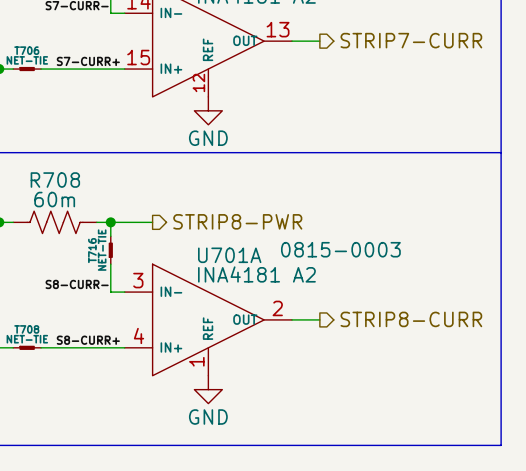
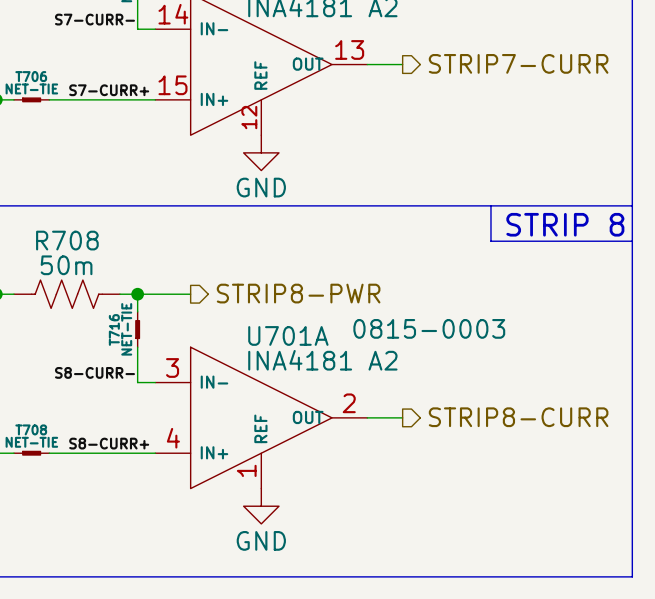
line: none -> (490, 205) (490, 241) (632, 241)
text: none -> STRIP 8 (565, 224)
R708 value: 60m (54, 199) -> 50m (66, 265)

